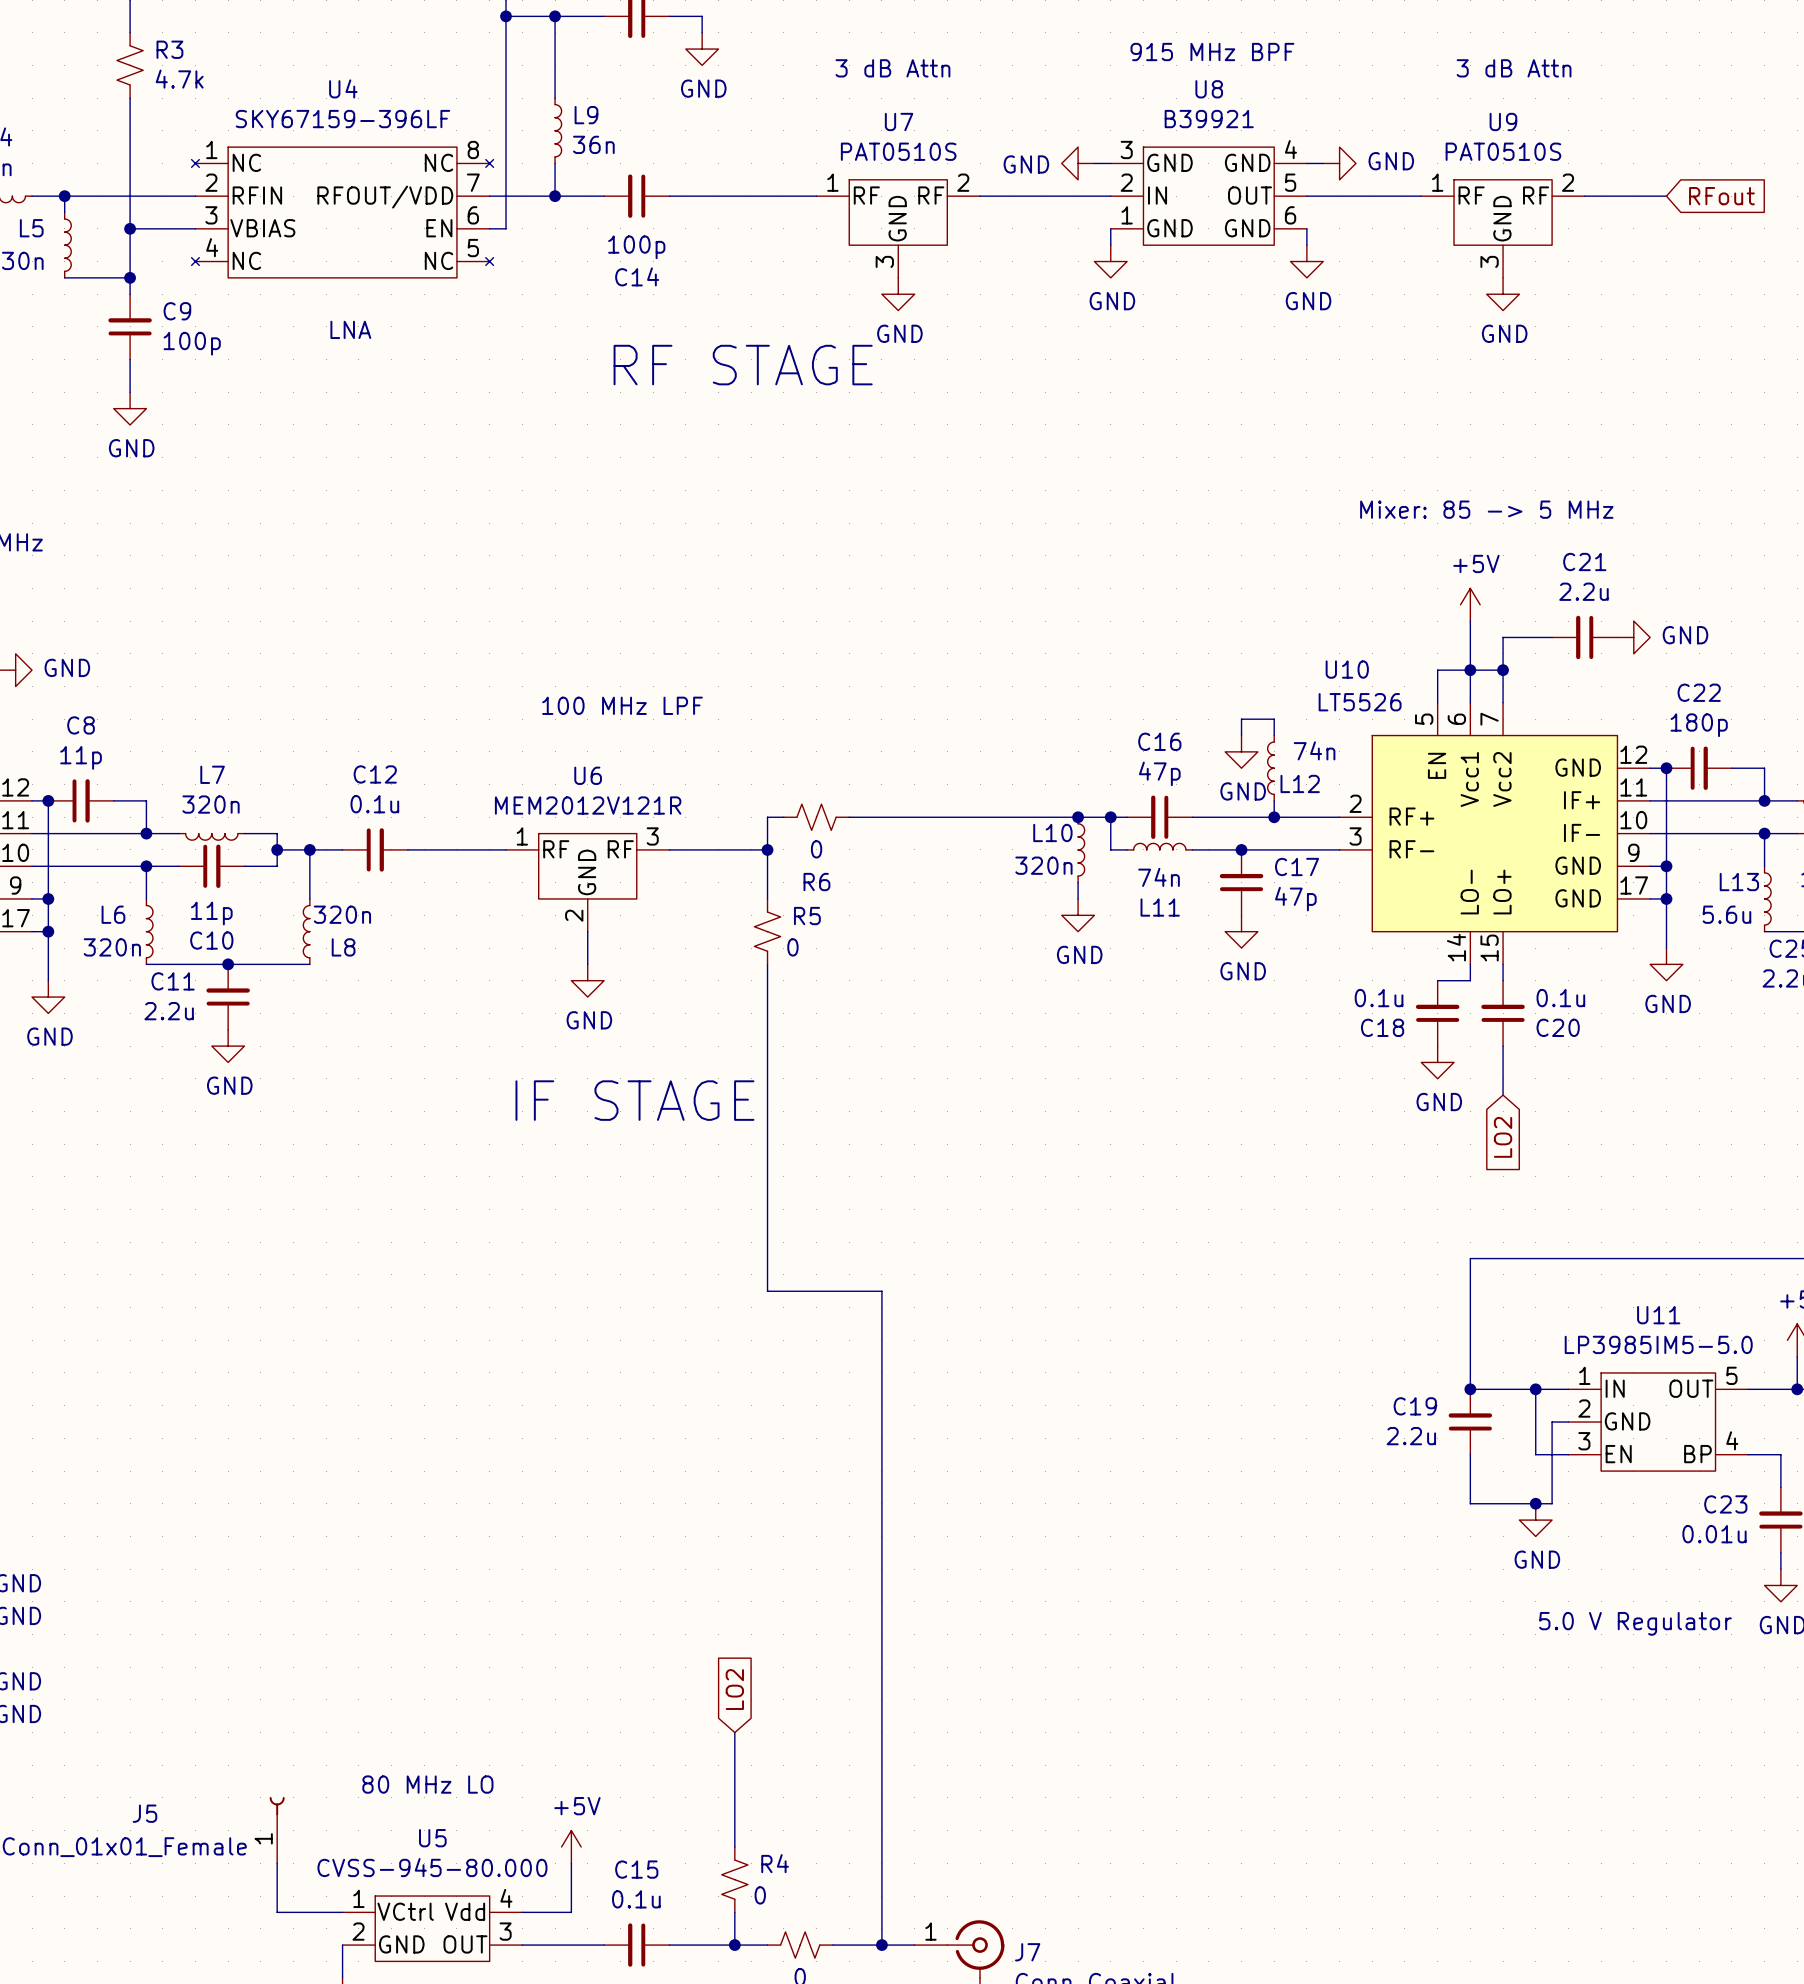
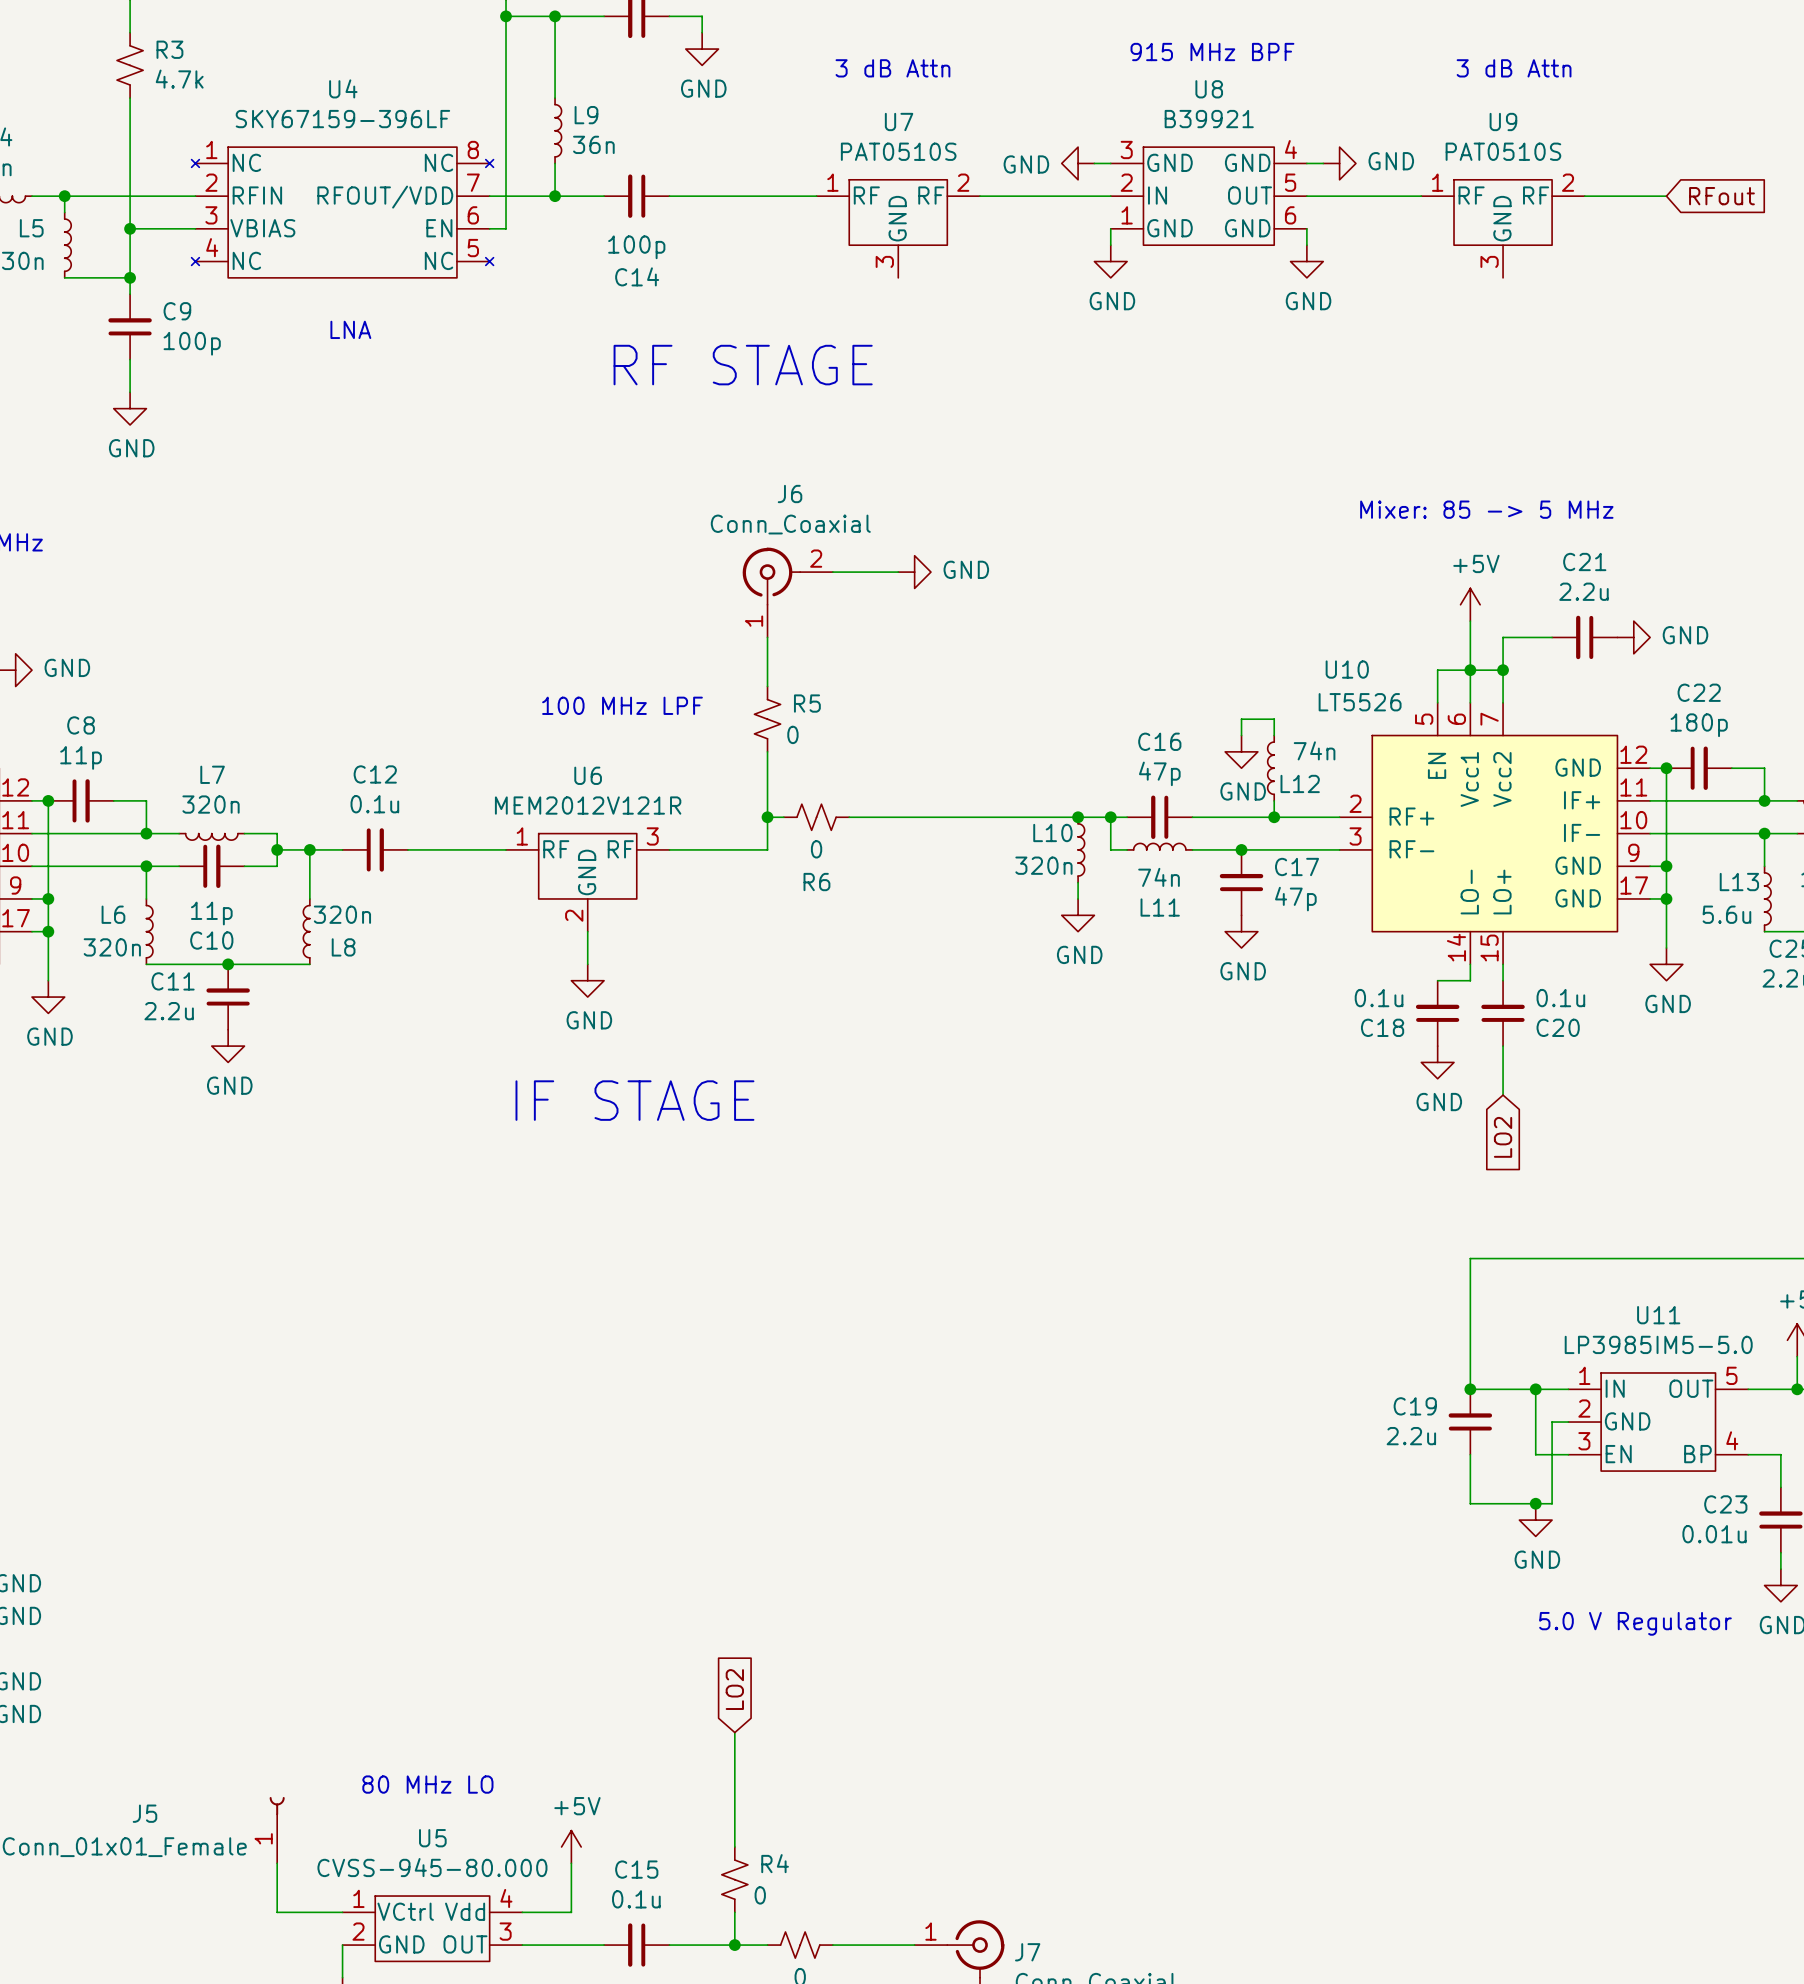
power symbol rotation: 0° (898, 294) -> 90° counterclockwise (914, 572)
power symbol position: GND (898, 294) -> GND (914, 572)
power symbol: GND (1503, 294) -> none
wire: none -> (832, 572) (898, 572)
J6: none -> Conn_Coaxial (787, 592)
wire: none -> (767, 751) (767, 817)
wire: (767, 849) (767, 898) -> (767, 637) (767, 686)
junction position: (767, 849) -> (767, 817)
R5 position: (767, 931) -> (767, 719)
wire: (767, 964) (767, 1291) (881, 1291) (881, 1945) -> none
junction: (881, 1945) -> none

